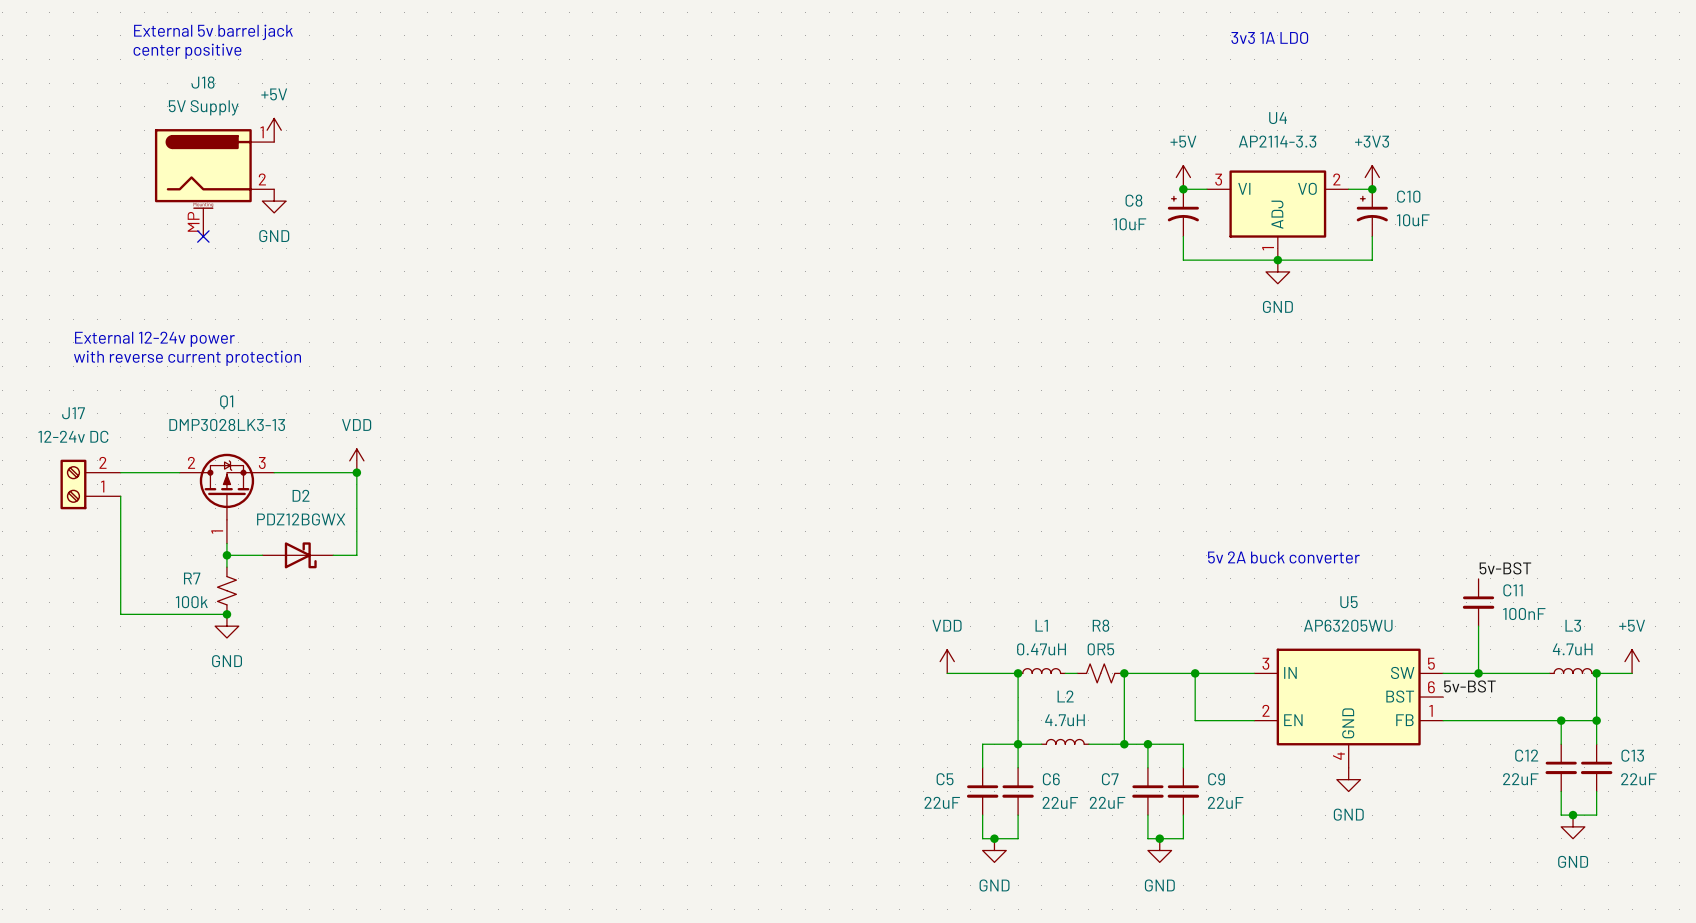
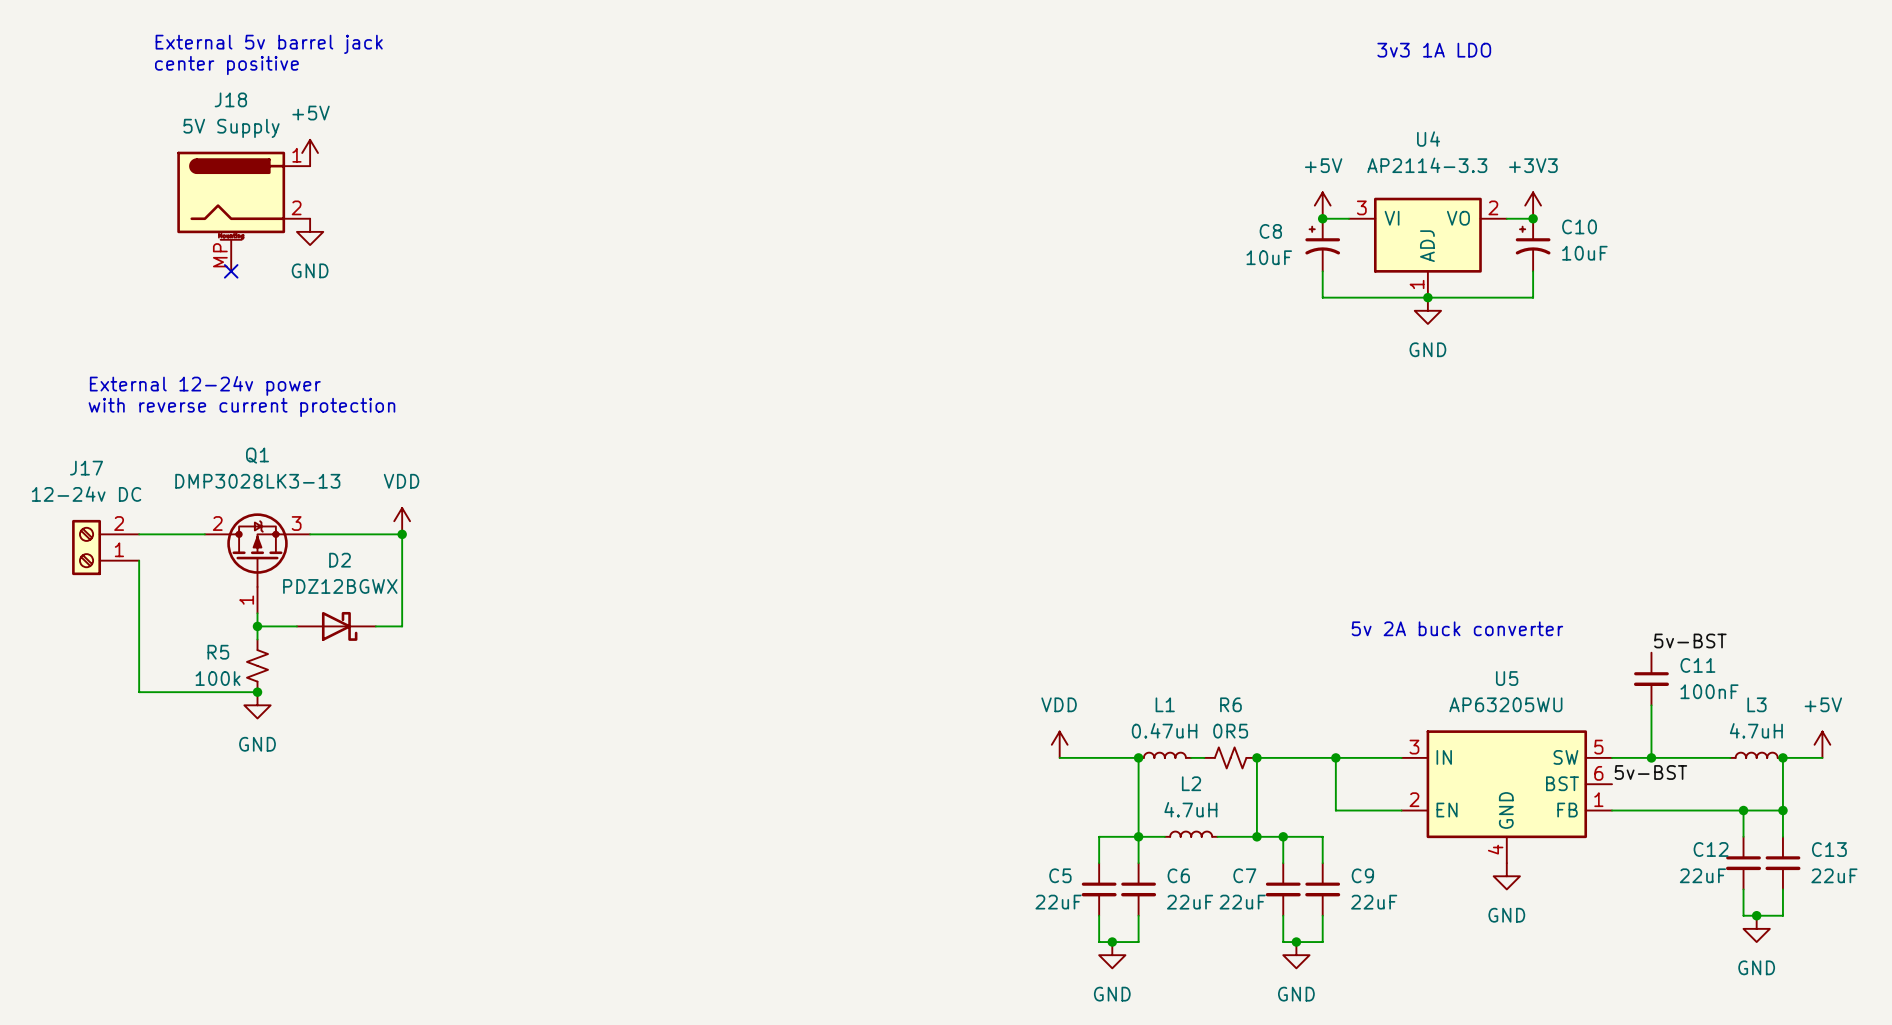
R7 name: R7 (192, 578) -> R5 (218, 652)
R8 name: R8 (1101, 625) -> R6 (1230, 704)

